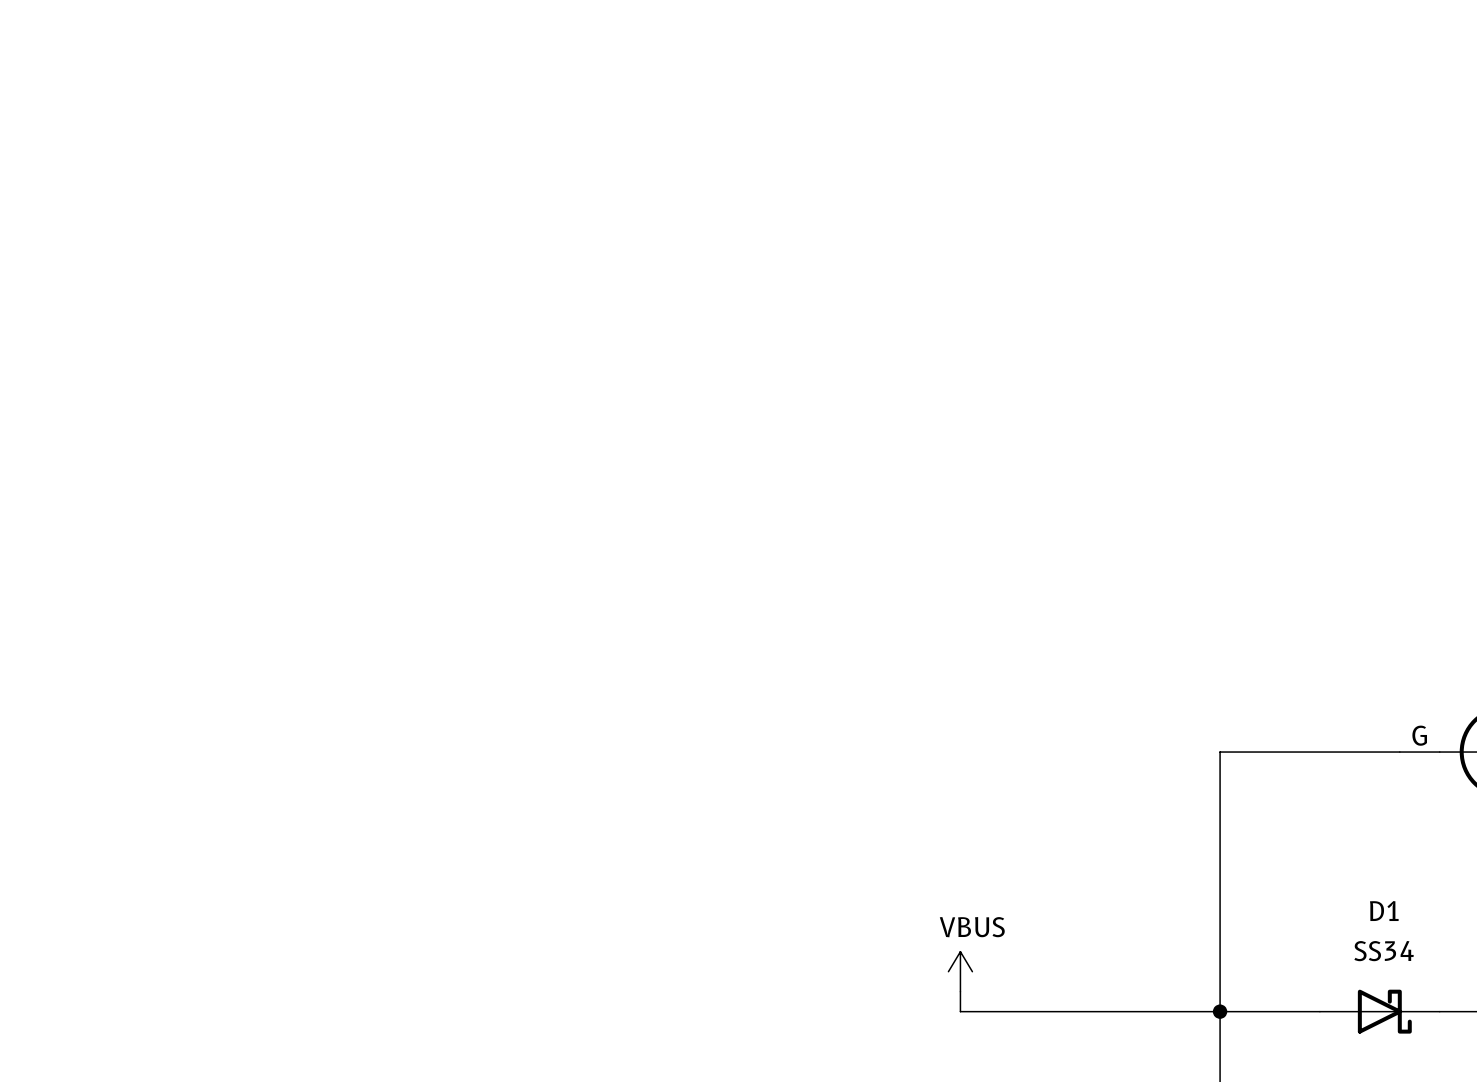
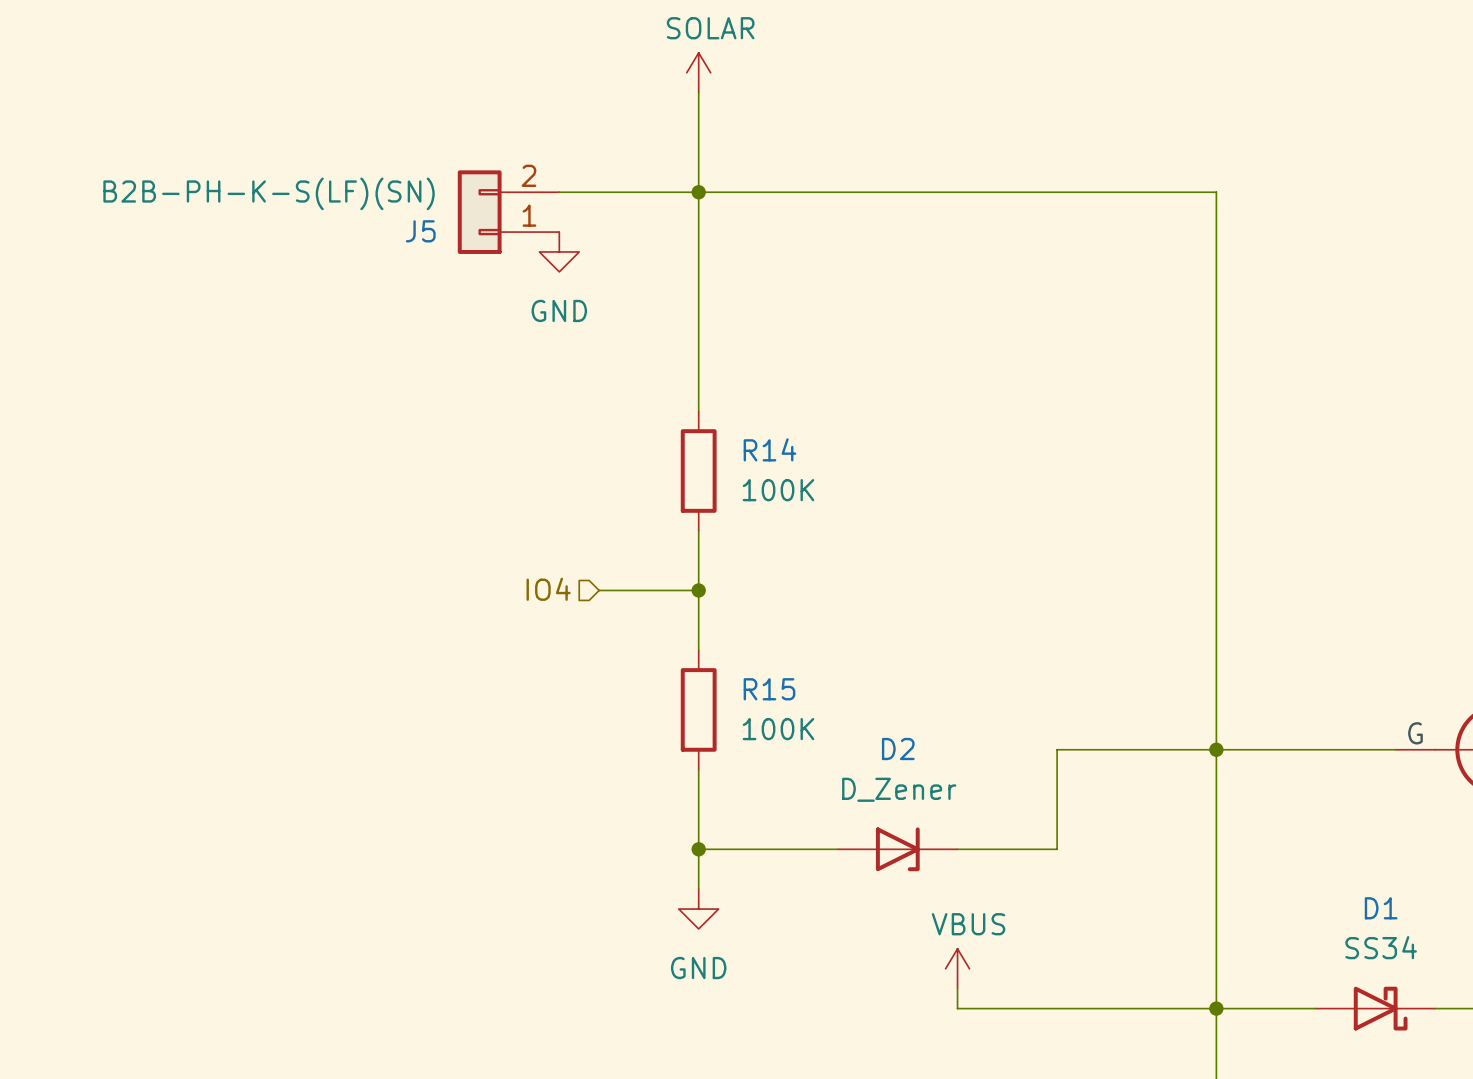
power symbol: none -> SOLAR (698, 72)
wire: none -> (698, 92) (698, 411)
wire: none -> (559, 192) (1216, 192) (1216, 749) (1057, 749) (1057, 849) (957, 849)
junction: none -> (698, 192)
J5: none -> B2B-PH-K-S(LF)(SN) (508, 212)
power symbol: none -> GND (559, 251)
R14: none -> 100K (698, 471)
wire: none -> (698, 530) (698, 650)
hierarchical label: none -> IO4 (548, 589)
wire: none -> (599, 590) (698, 590)
junction: none -> (698, 590)
R15: none -> 100K (698, 709)
junction: none -> (1216, 749)
wire: none -> (698, 769) (698, 889)
wire: none -> (698, 849) (838, 849)
junction: none -> (698, 849)
D2: none -> D_Zener (897, 849)
power symbol: none -> GND (698, 909)

